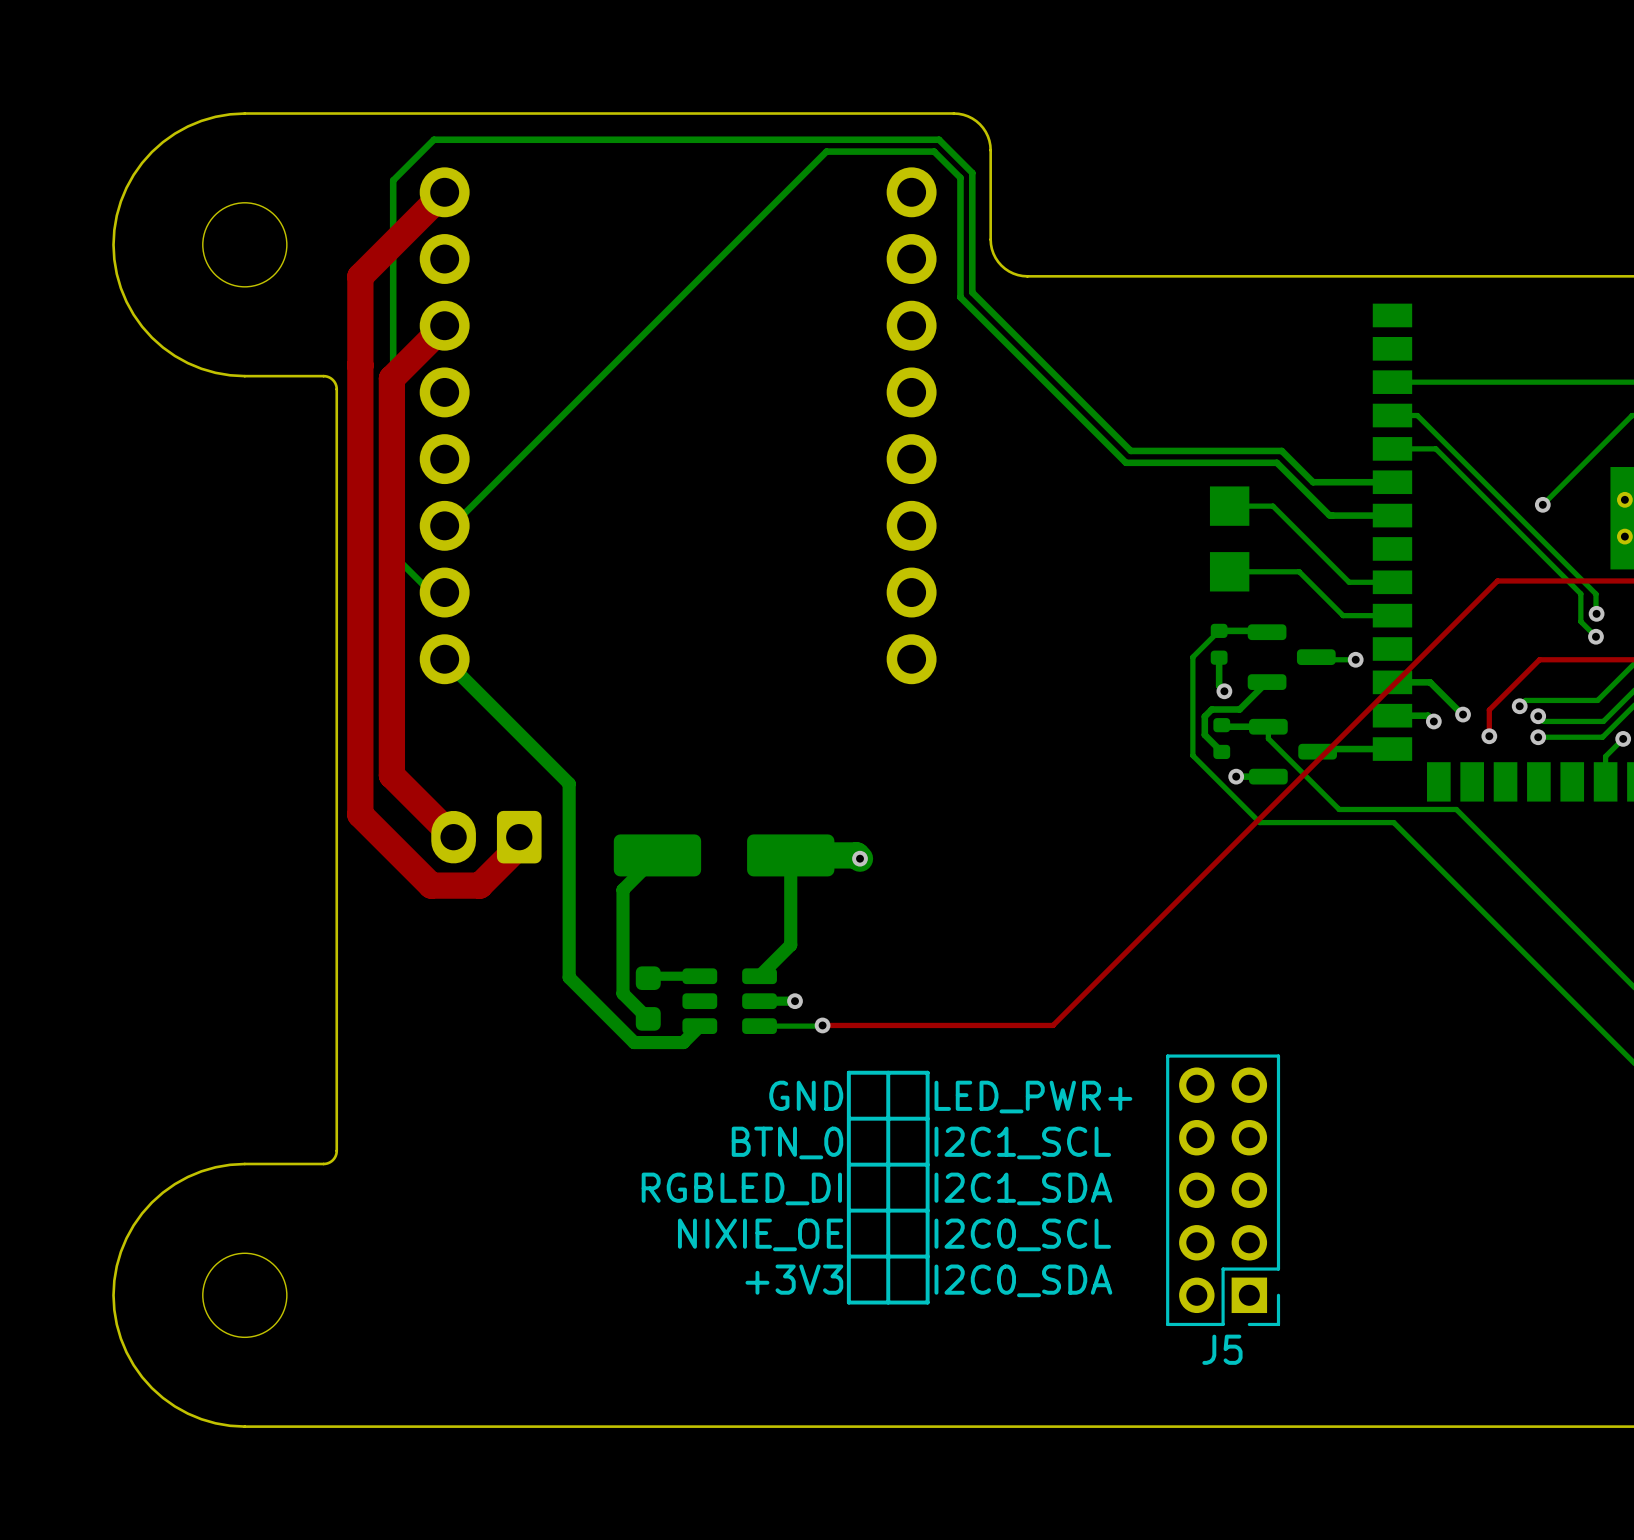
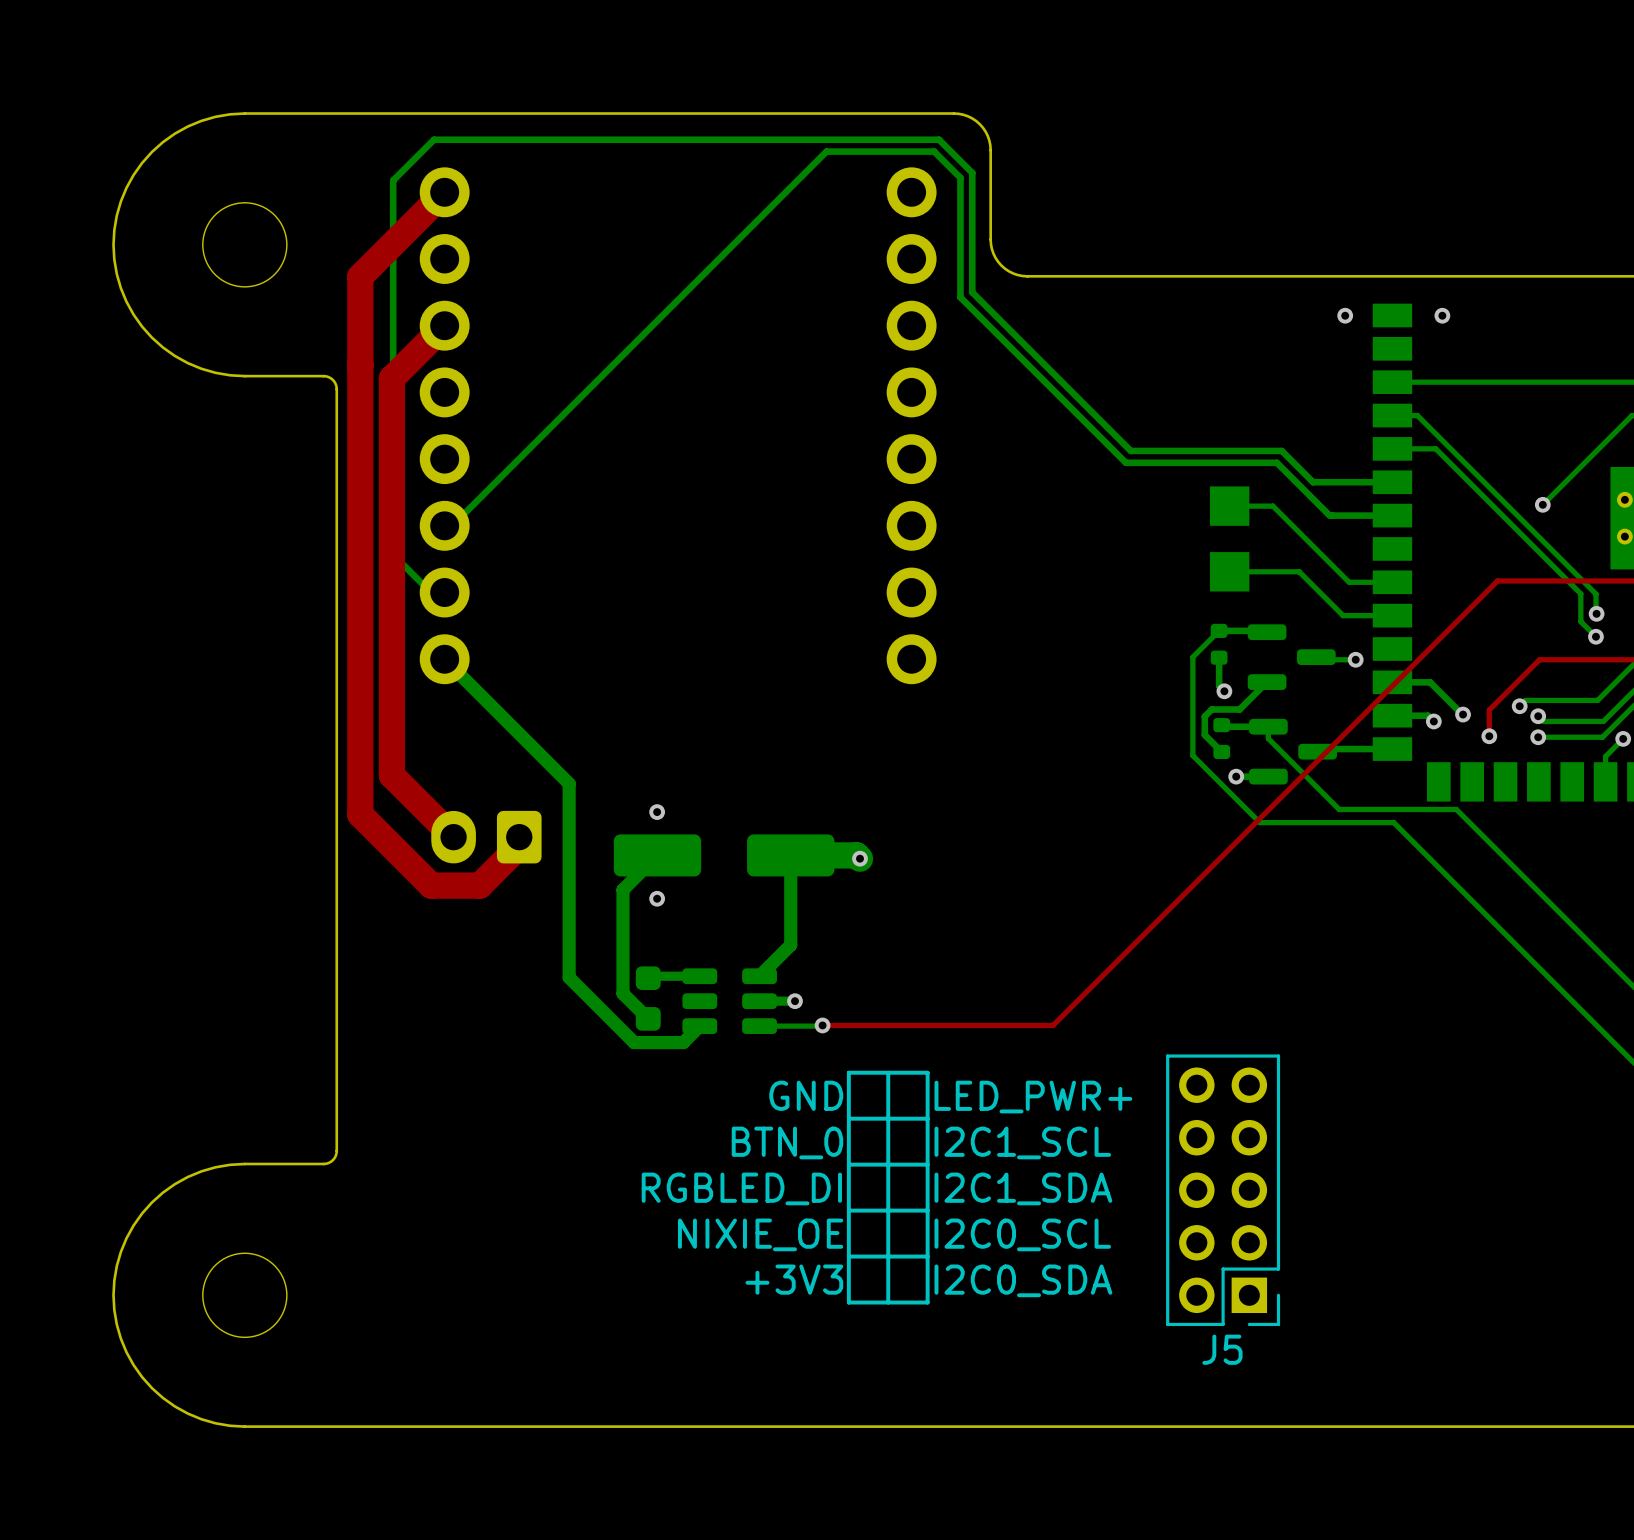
via: none -> (1345, 315)
via: none -> (1442, 315)
via: none -> (657, 812)
via: none -> (657, 898)

